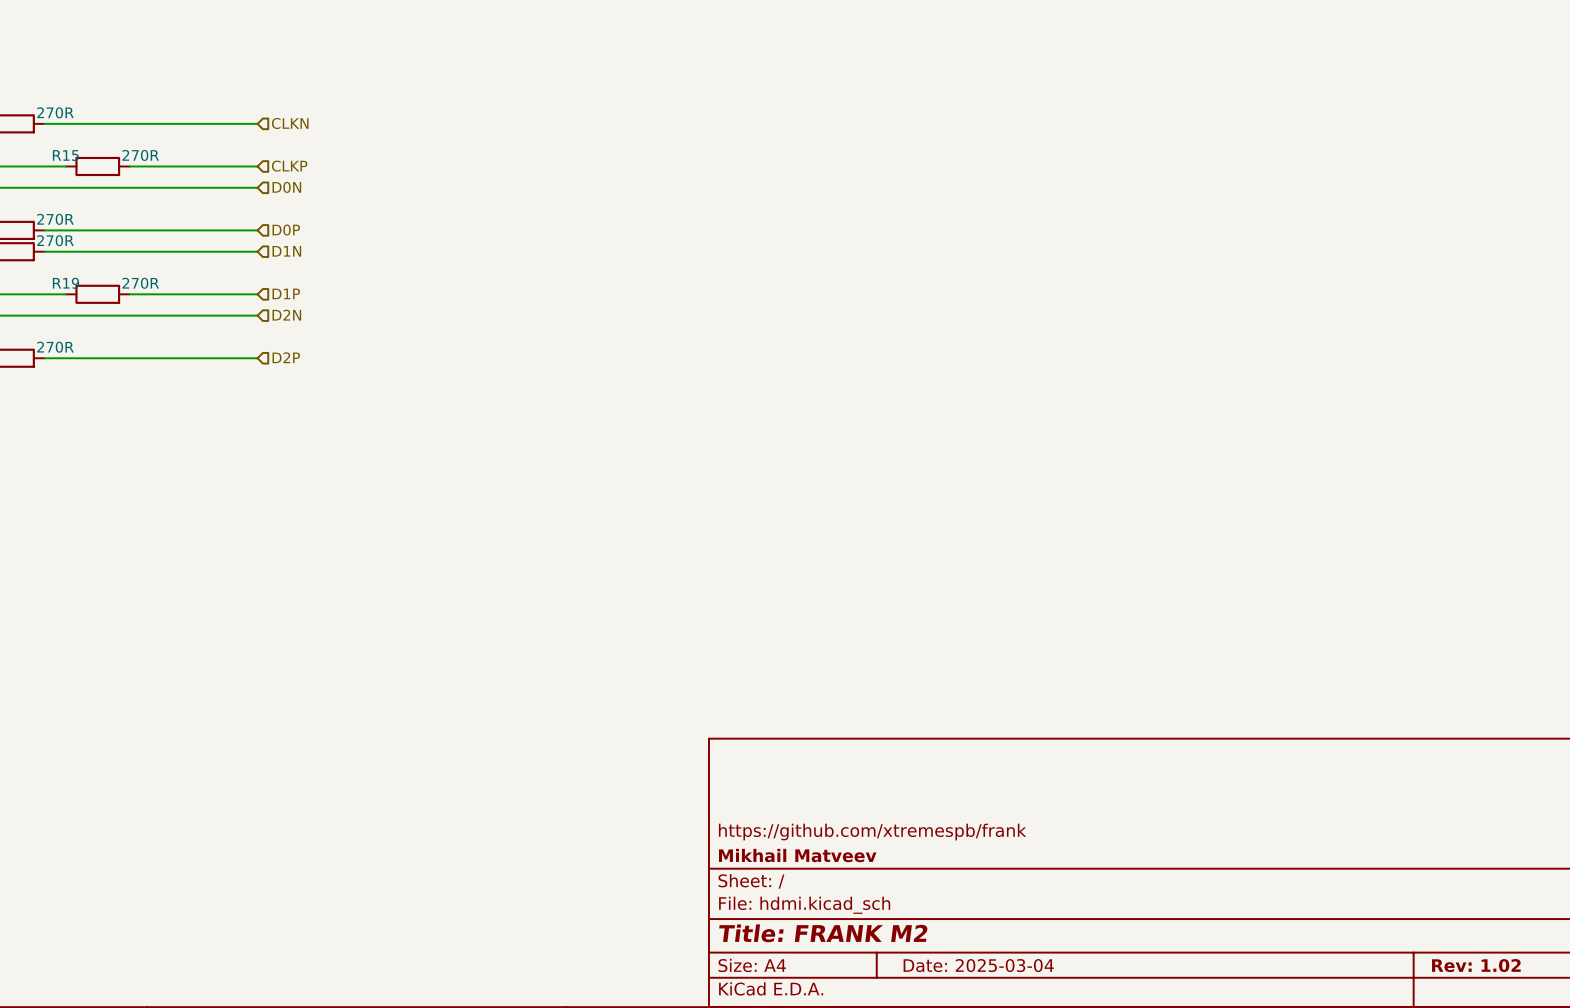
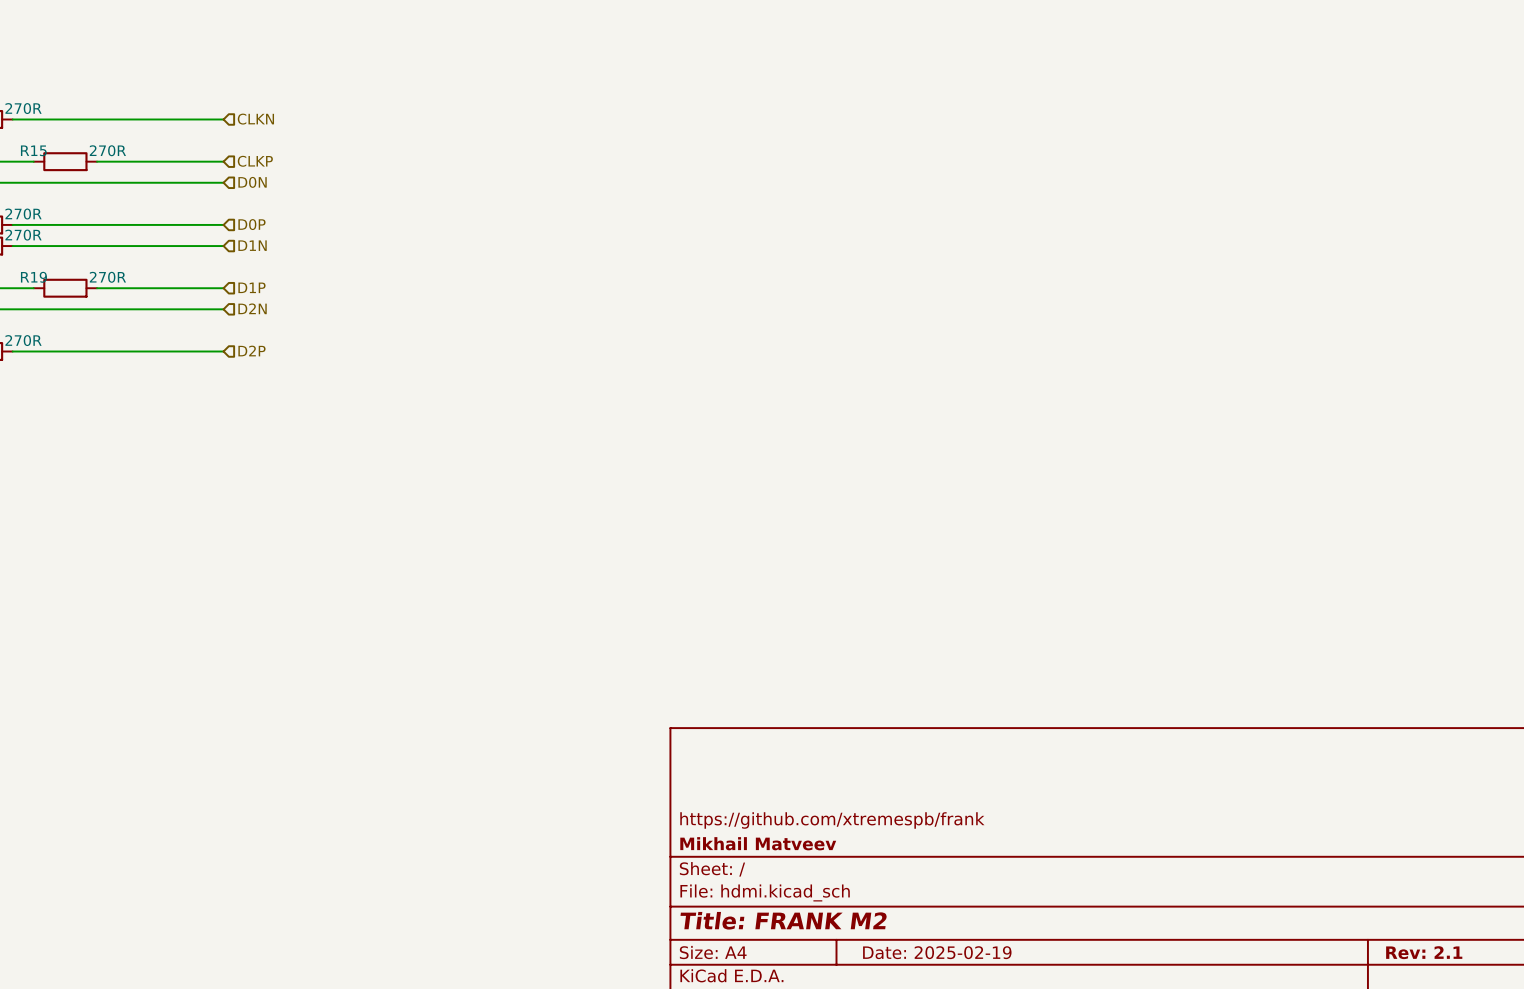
title block: Date: 2025-03-04 (978, 965) -> Date: 2025-02-19 (937, 952)
title block: Rev: 1.02 (1476, 965) -> Rev: 2.1 (1424, 952)

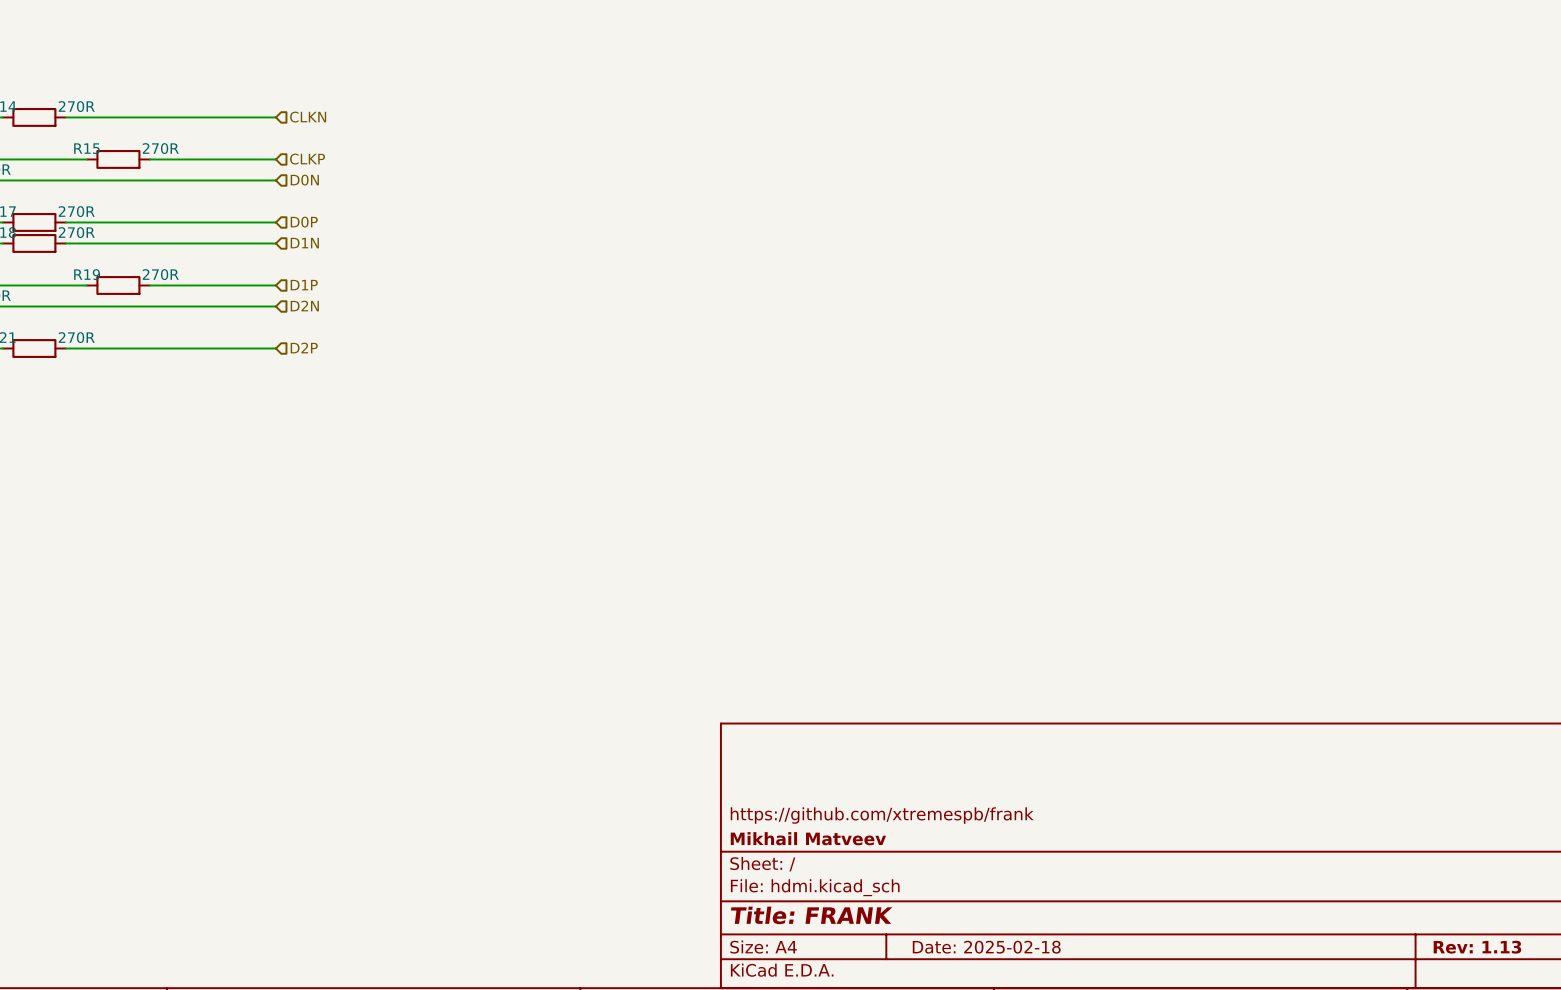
title block: Title: FRANK M2 (783, 920) -> Title: FRANK (811, 915)
title block: Date: 2025-02-19 (937, 952) -> Date: 2025-02-18 (986, 947)
title block: Rev: 2.1 (1424, 952) -> Rev: 1.13 (1477, 947)

